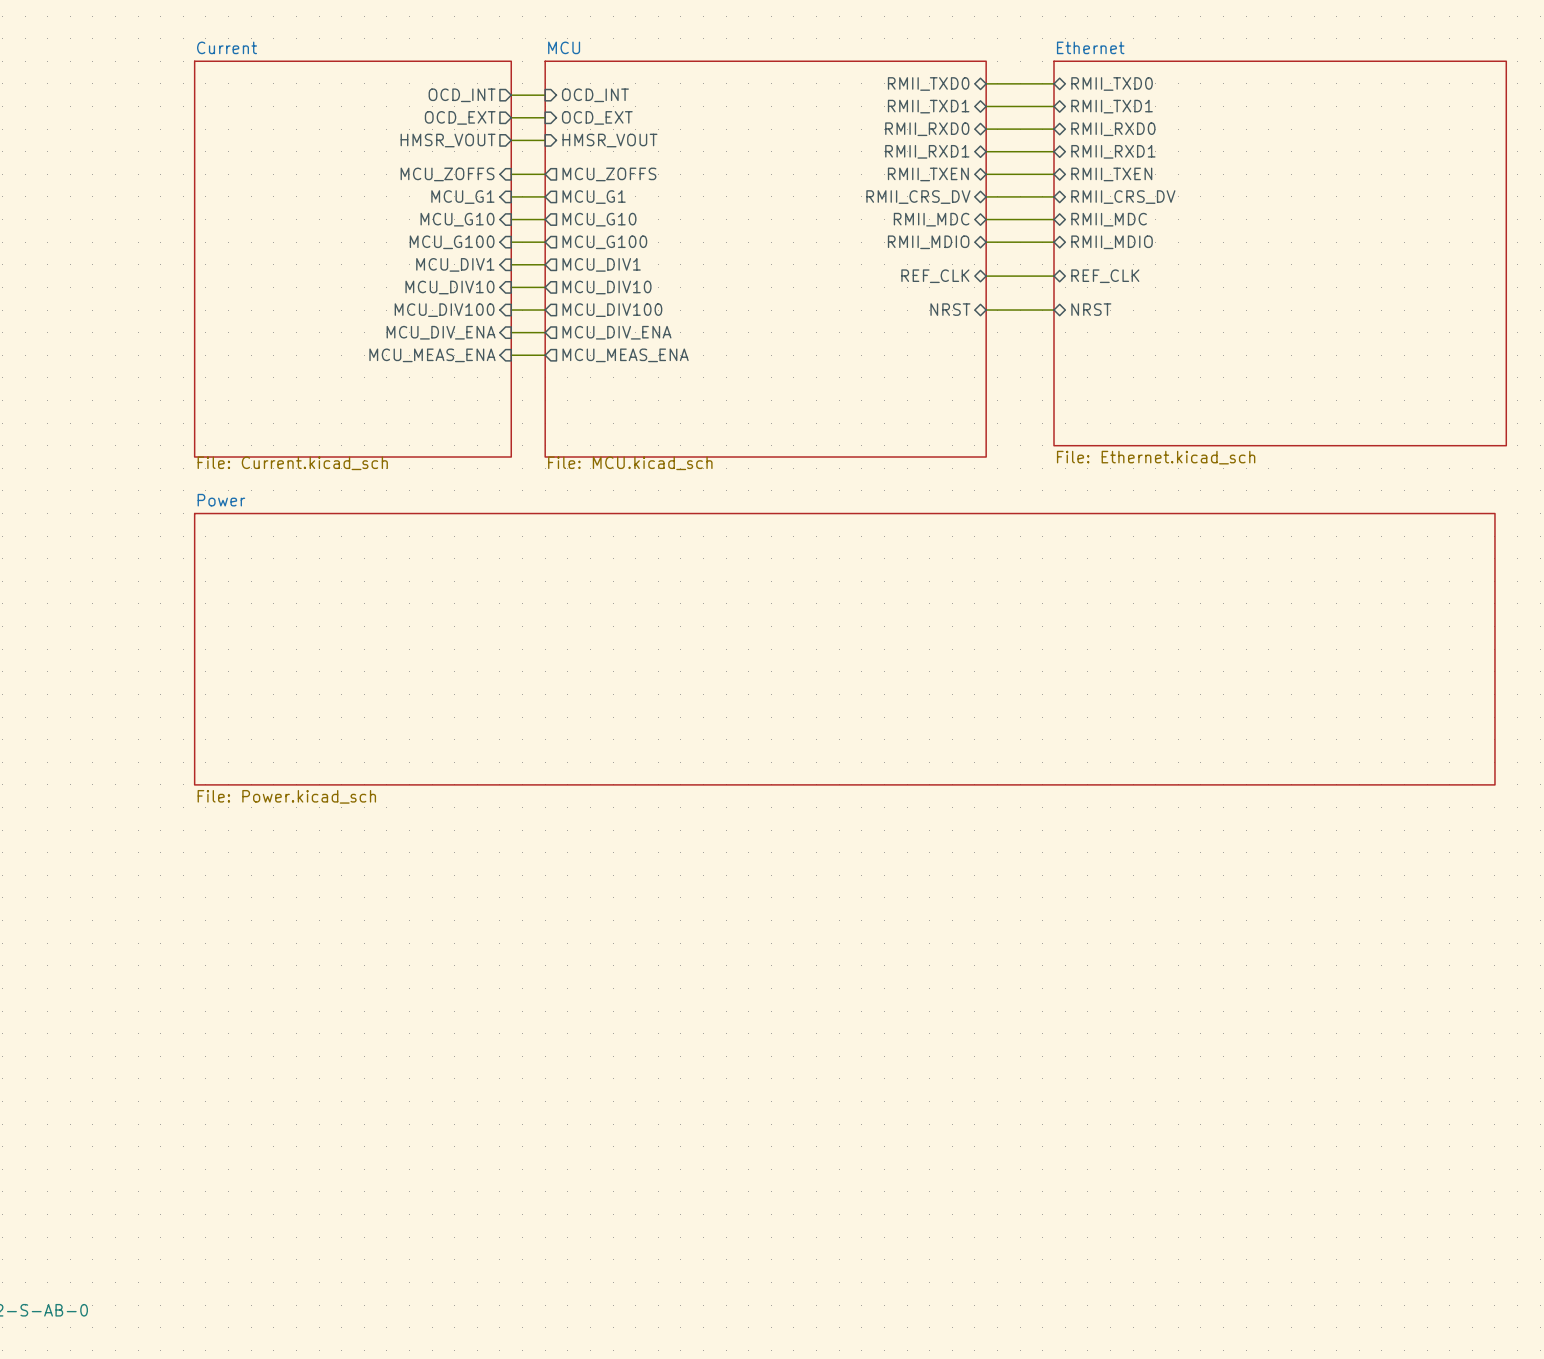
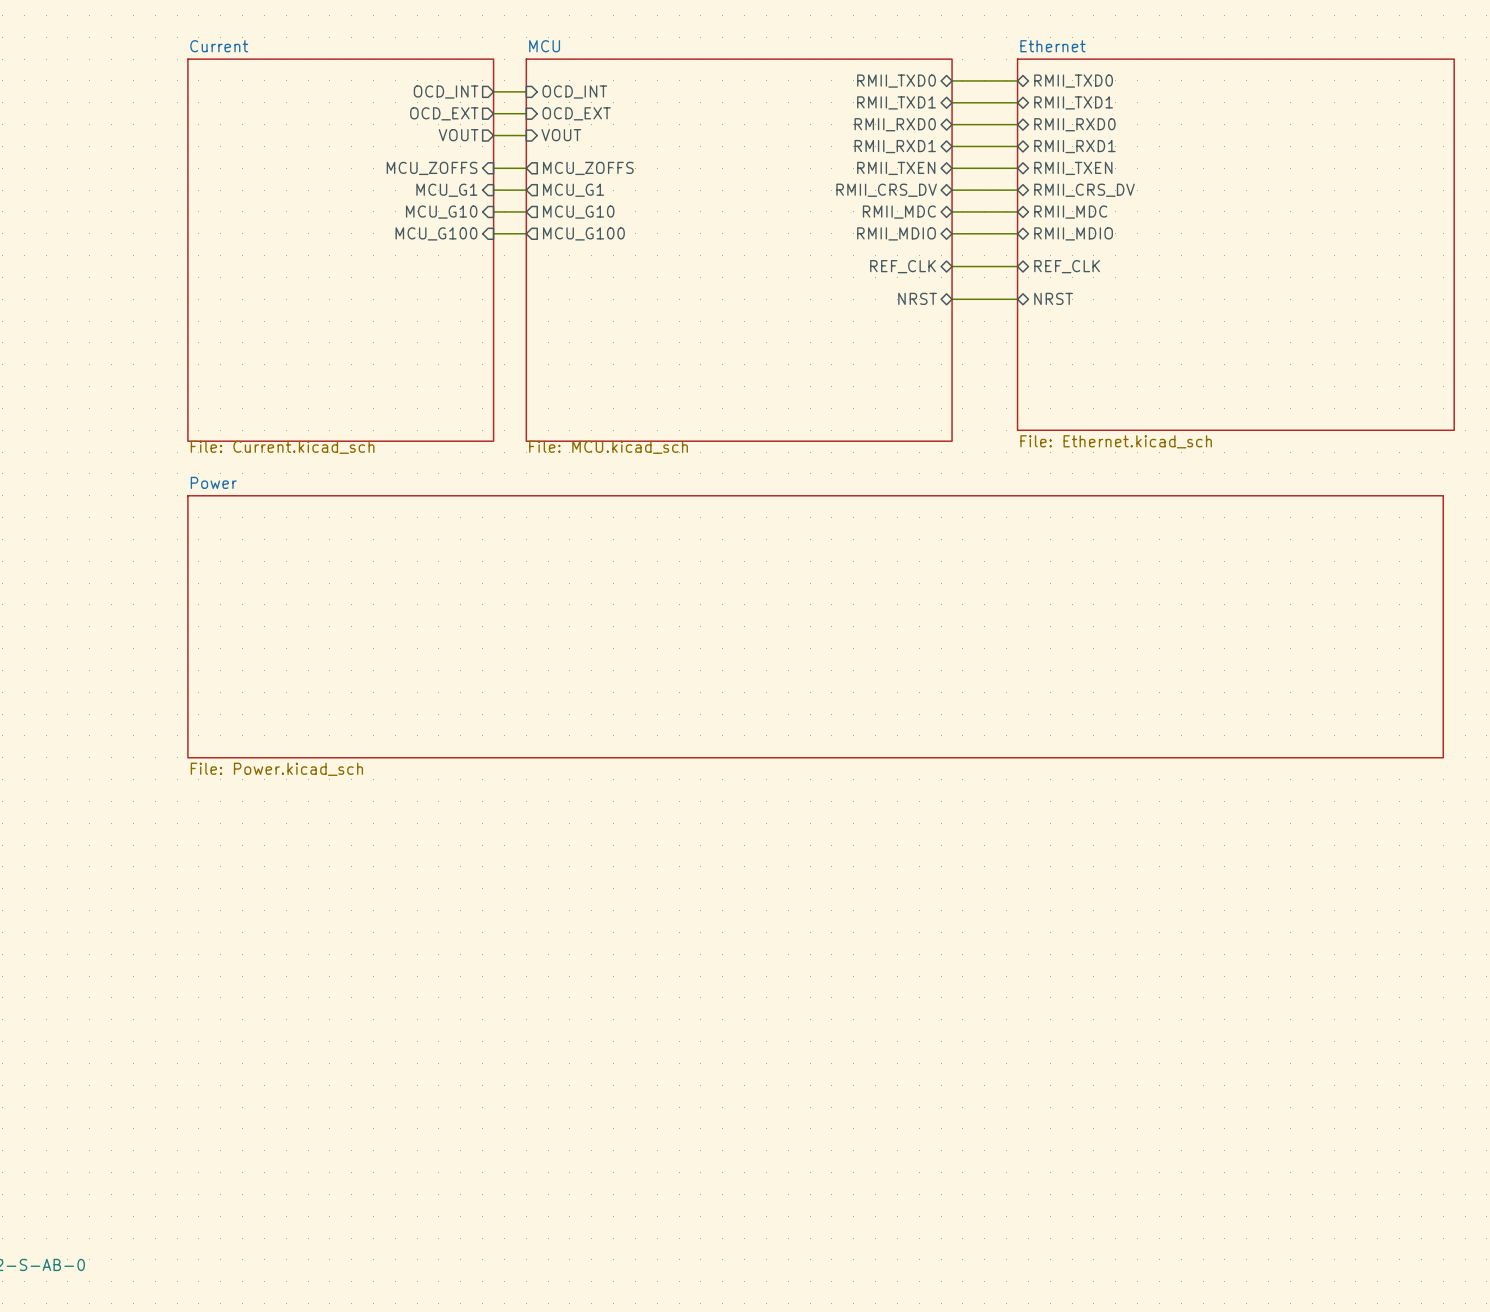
sheet pin: HMSR_VOUT (448, 140) -> VOUT (458, 135)
sheet pin: HMSR_VOUT (609, 140) -> VOUT (561, 135)
sheet pin: MCU_DIV1 (455, 264) -> none
wire: (511, 264) (545, 264) -> none
sheet pin: MCU_DIV1 (601, 264) -> none
sheet pin: MCU_DIV10 (449, 287) -> none
wire: (511, 287) (545, 287) -> none
sheet pin: MCU_DIV10 (607, 287) -> none
sheet pin: MCU_DIV100 (444, 310) -> none
wire: (511, 310) (545, 310) -> none
sheet pin: MCU_DIV100 (612, 310) -> none
sheet pin: MCU_DIV_ENA (441, 332) -> none
wire: (511, 332) (545, 332) -> none
sheet pin: MCU_DIV_ENA (616, 332) -> none
sheet pin: MCU_MEAS_ENA (432, 355) -> none
wire: (511, 355) (545, 355) -> none
sheet pin: MCU_MEAS_ENA (625, 355) -> none

